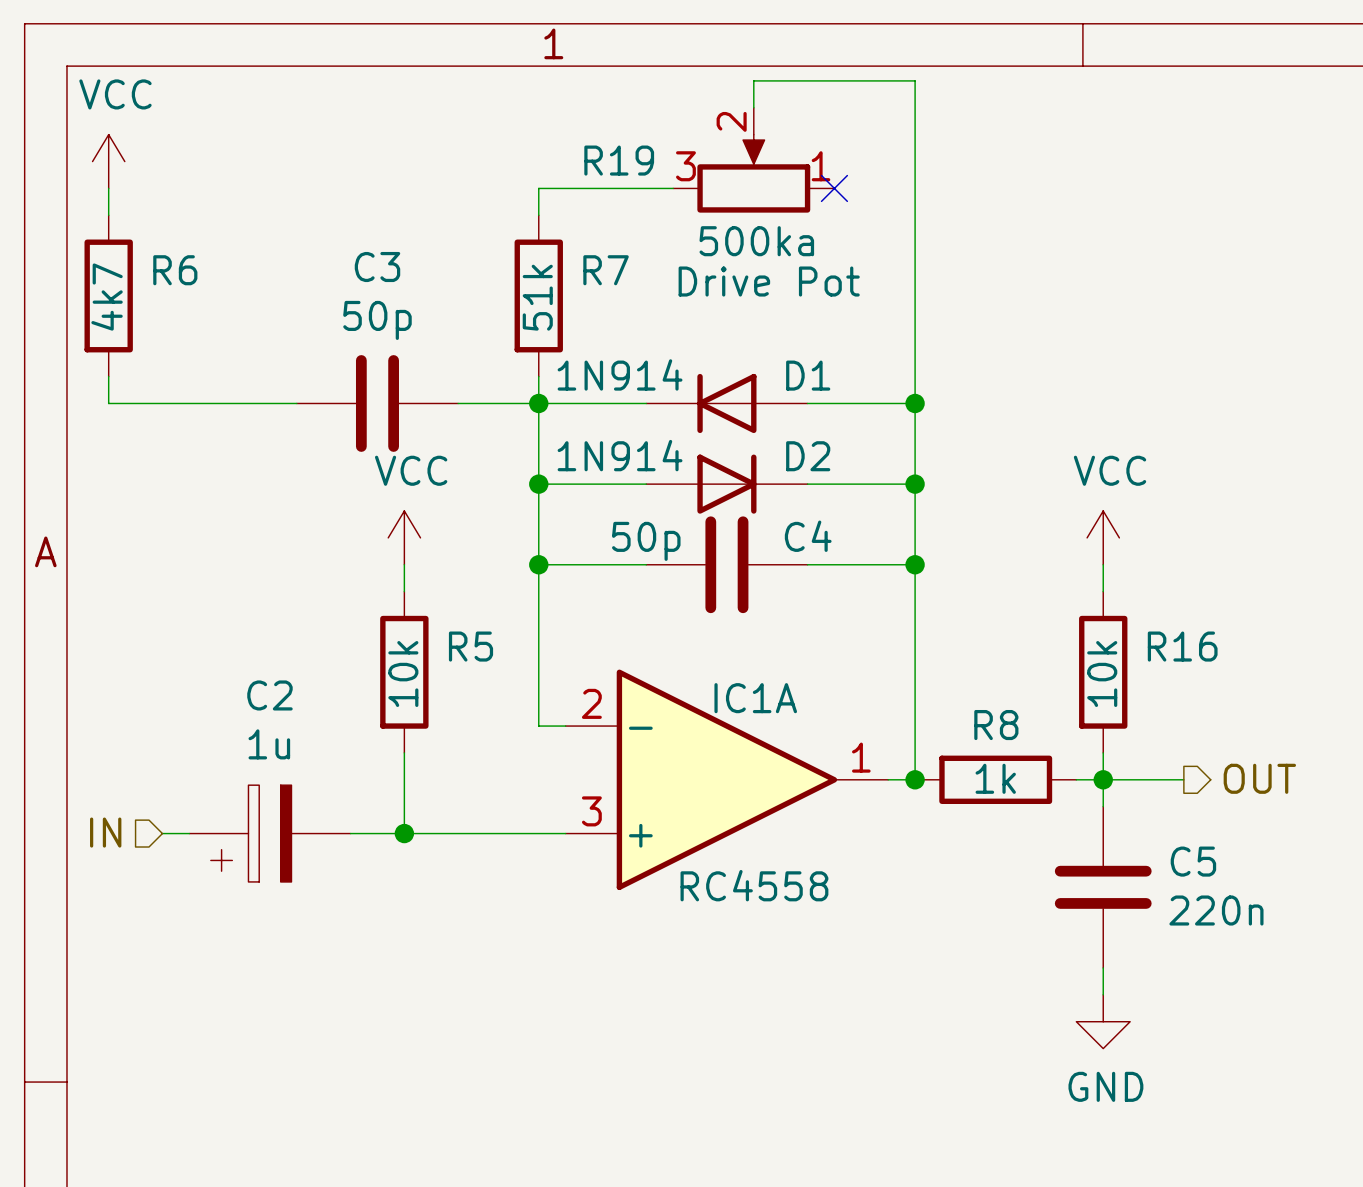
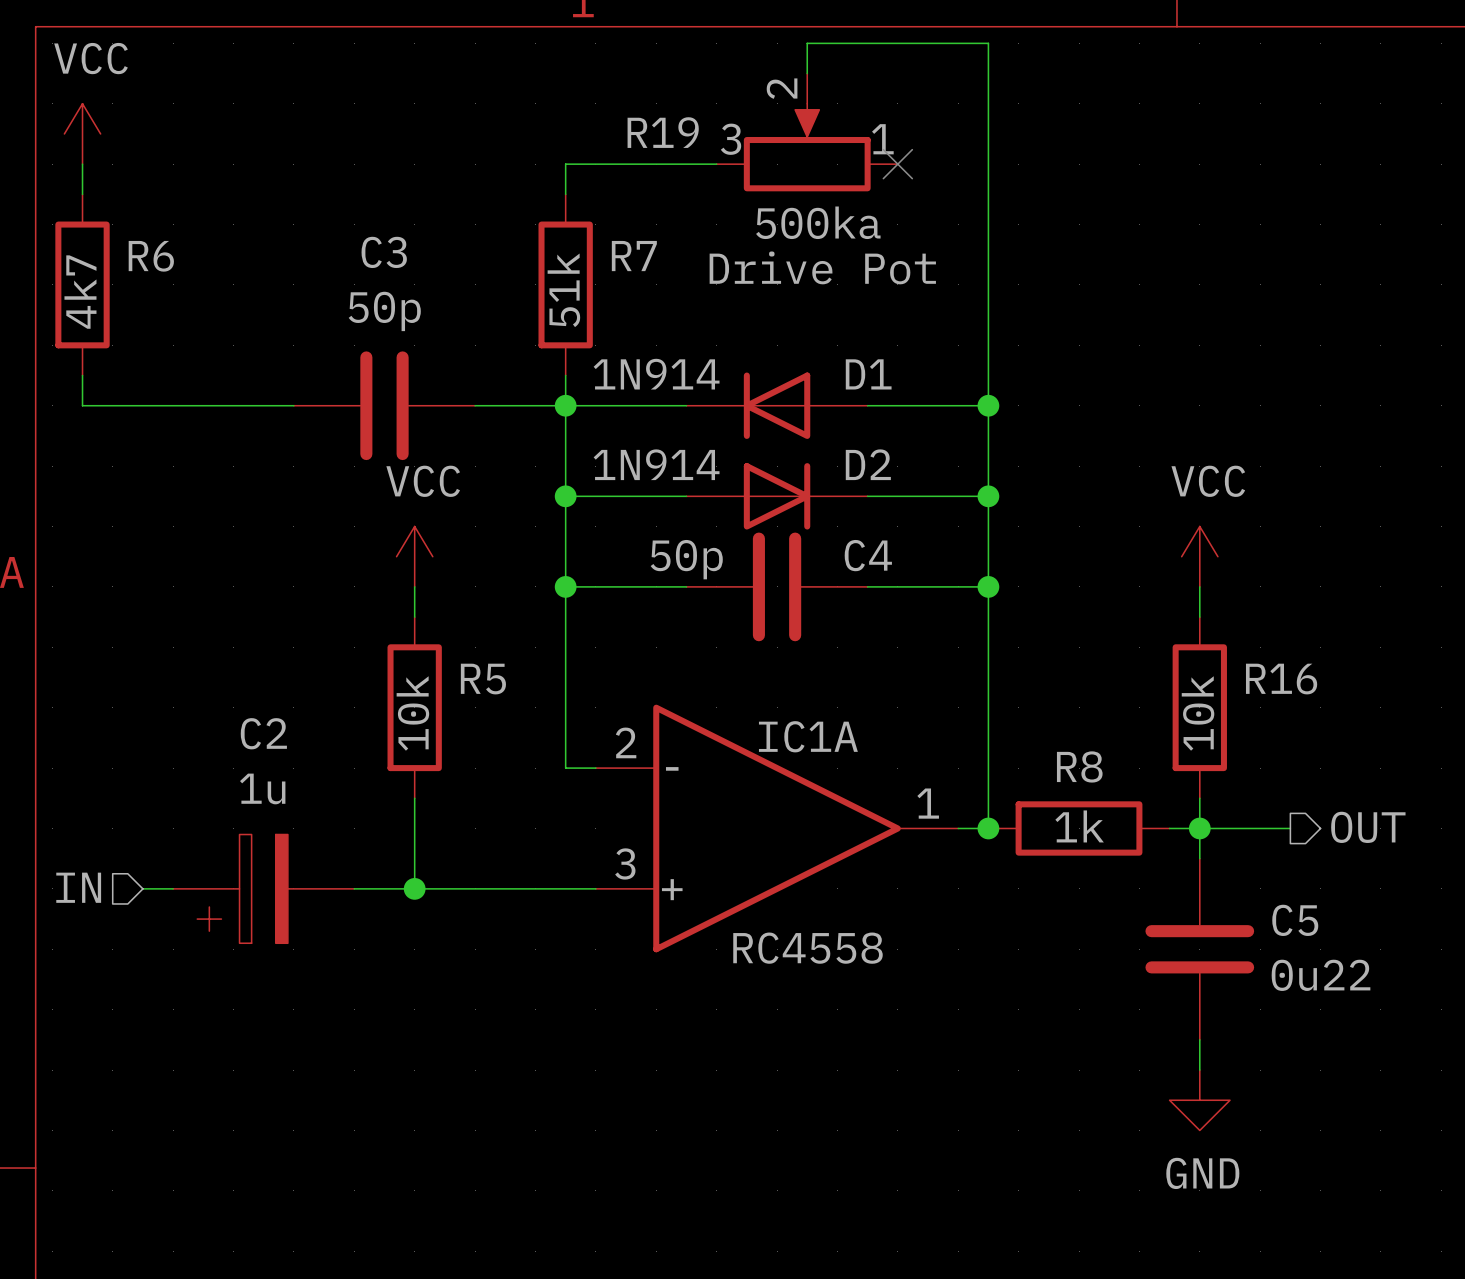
C5 value: 220n (1216, 910) -> 0u22 (1321, 975)

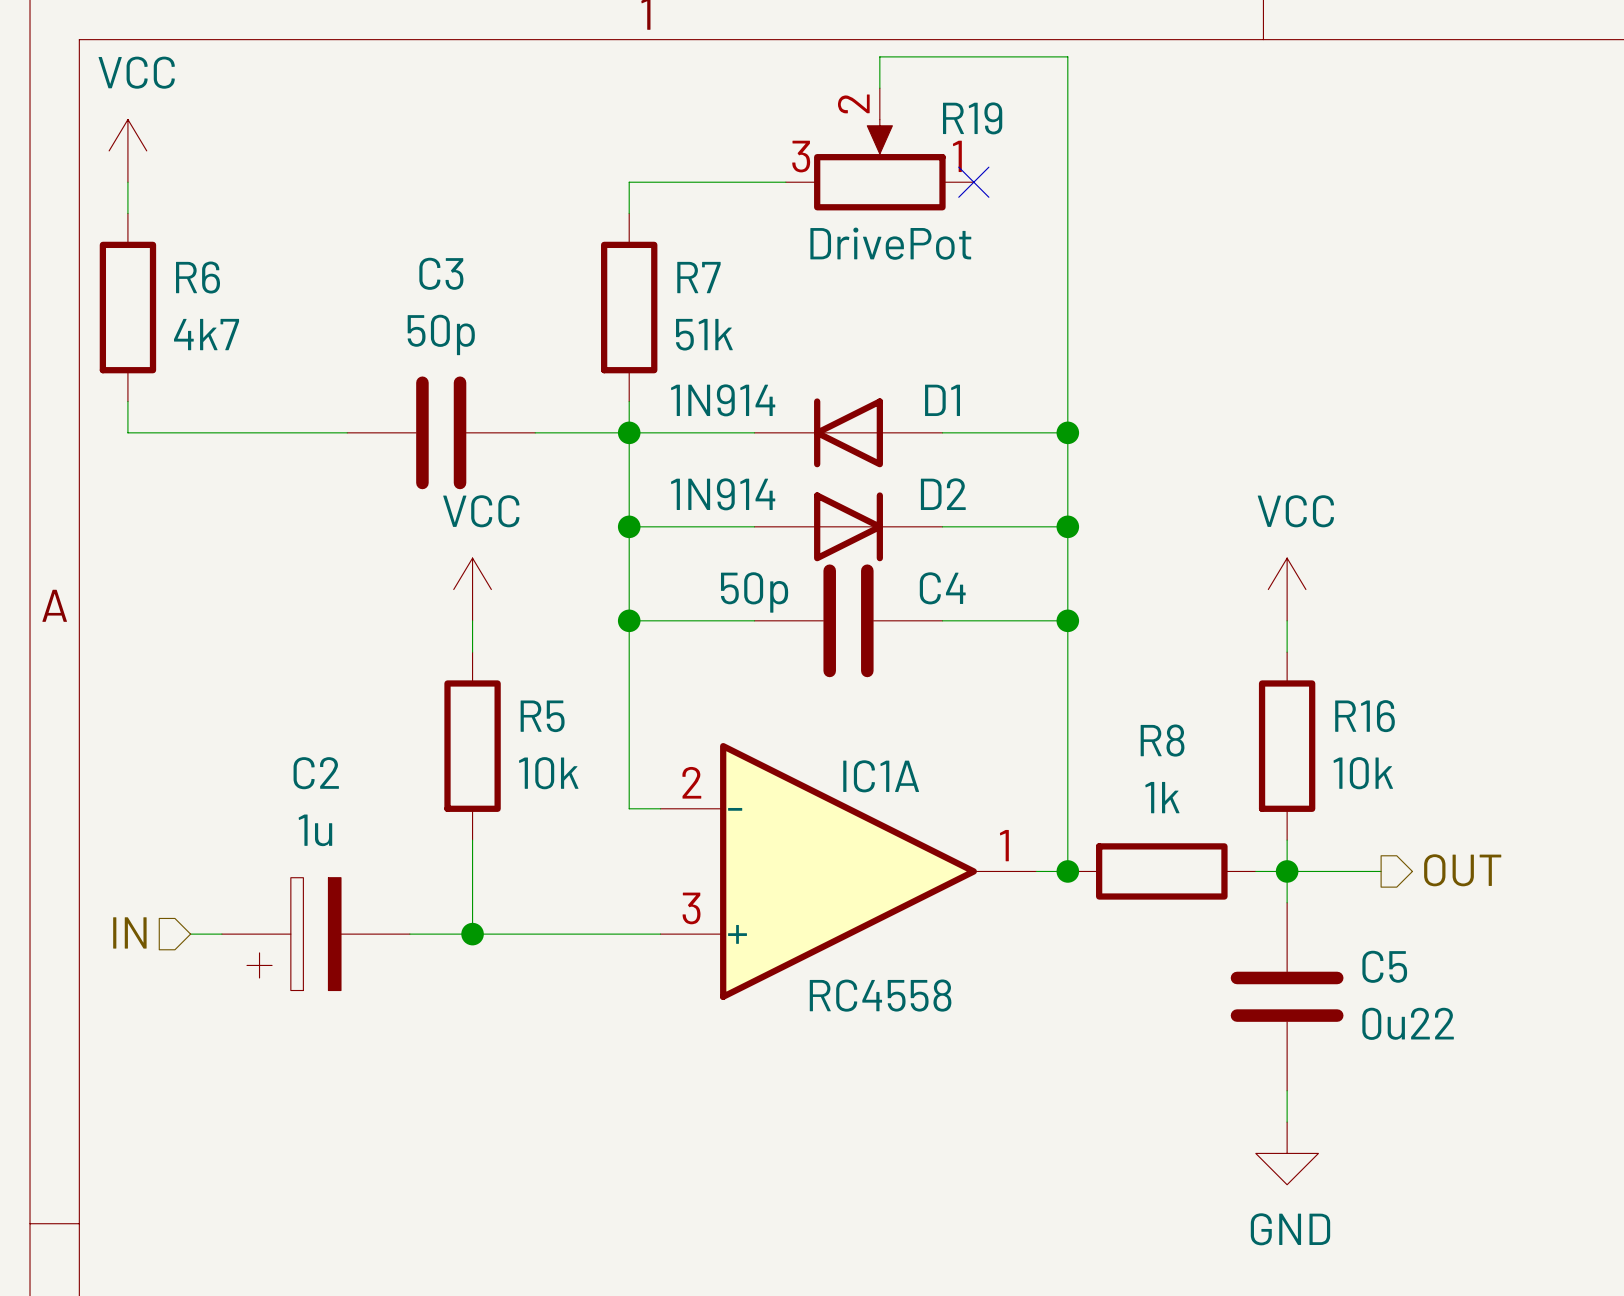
R19 name position: R19 (663, 132) -> R19 (972, 118)
R19 value: 500ka (818, 222) -> DrivePot (890, 243)
R19 text: Drive Pot (822, 267) -> none
R7 value rotation: 0° (563, 290) -> 90° clockwise (704, 334)
R6 value rotation: 0° (80, 292) -> 90° clockwise (206, 334)
R5 value rotation: 0° (412, 713) -> 90° clockwise (548, 773)
R16 value rotation: 0° (1198, 713) -> 90° clockwise (1363, 773)
R8 name position: R8 (1079, 766) -> R8 (1162, 740)
R8 value position: 1k (1079, 826) -> 1k (1162, 797)

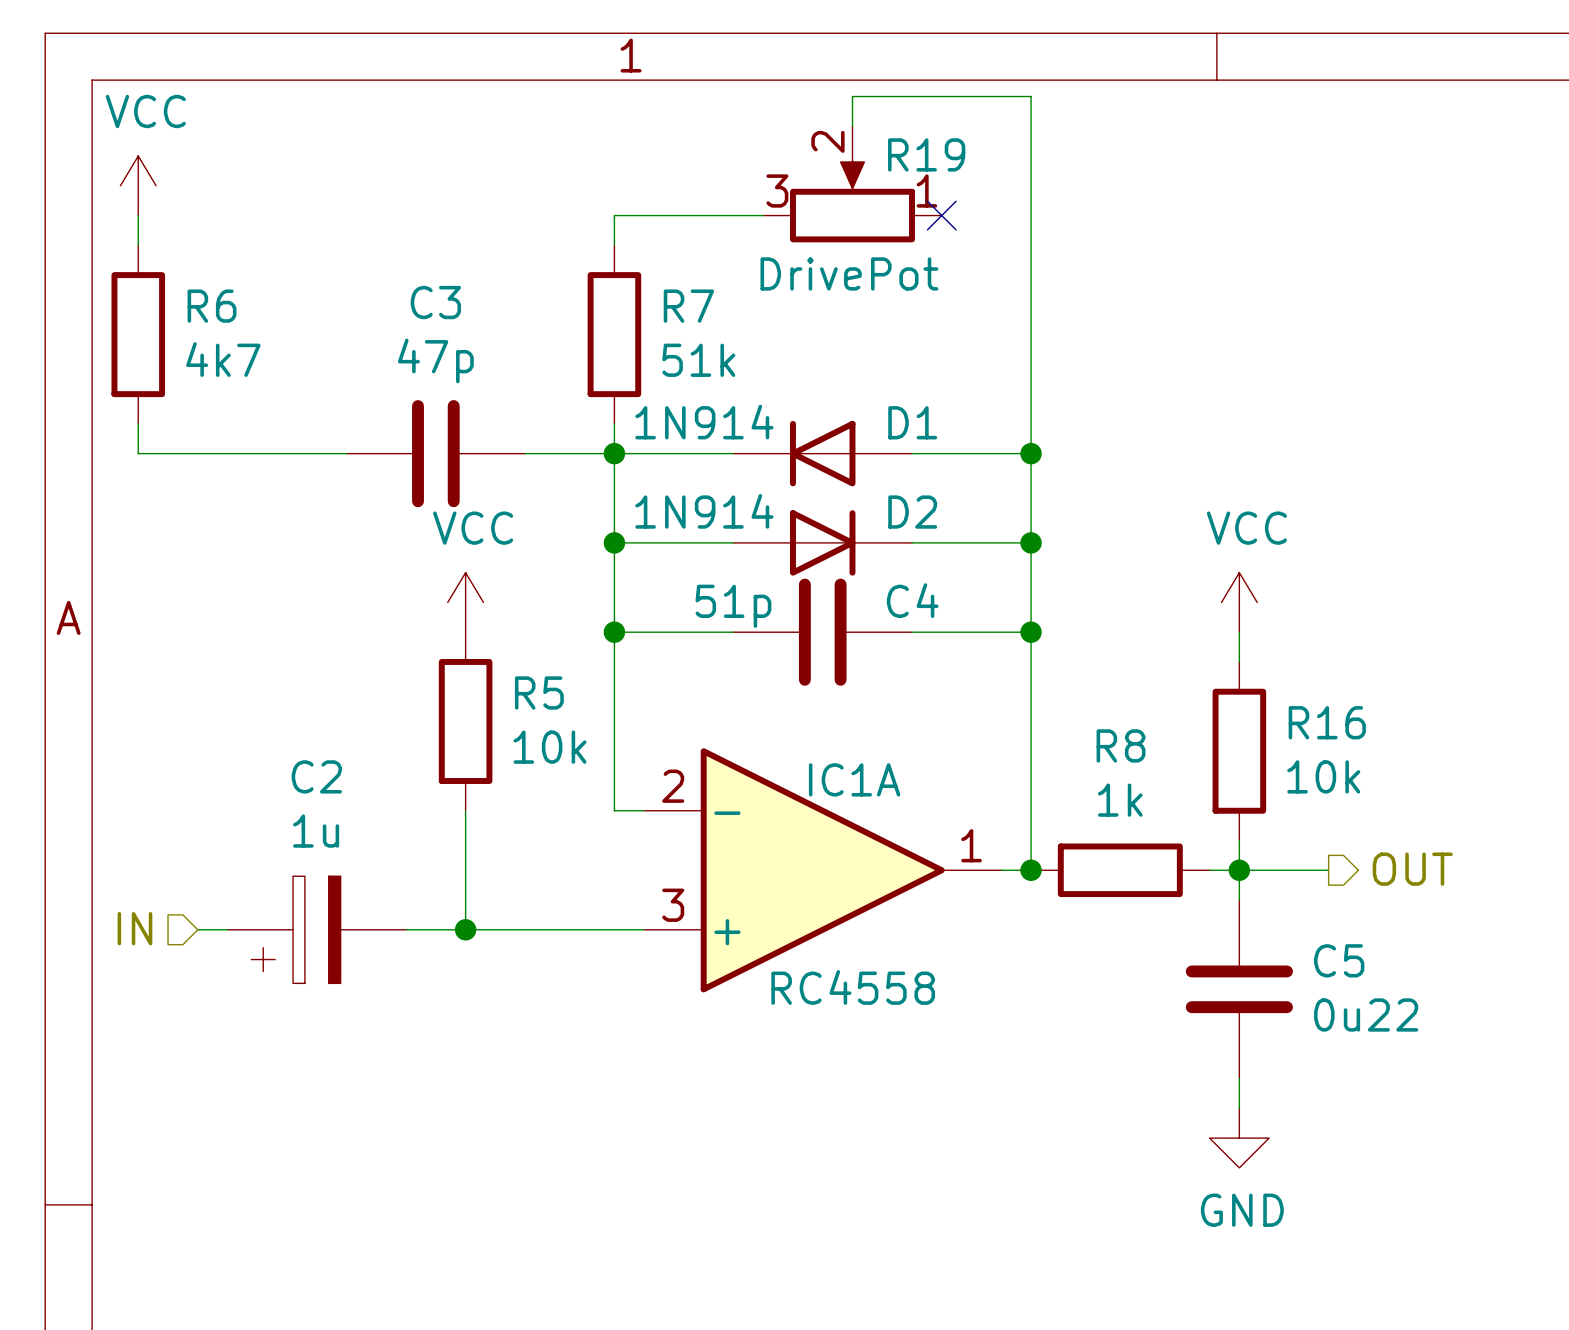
C3 value: 50p (441, 334) -> 47p (435, 360)
C4 value: 50p (754, 592) -> 51p (733, 606)
R5 position: (472, 746) -> (465, 721)

